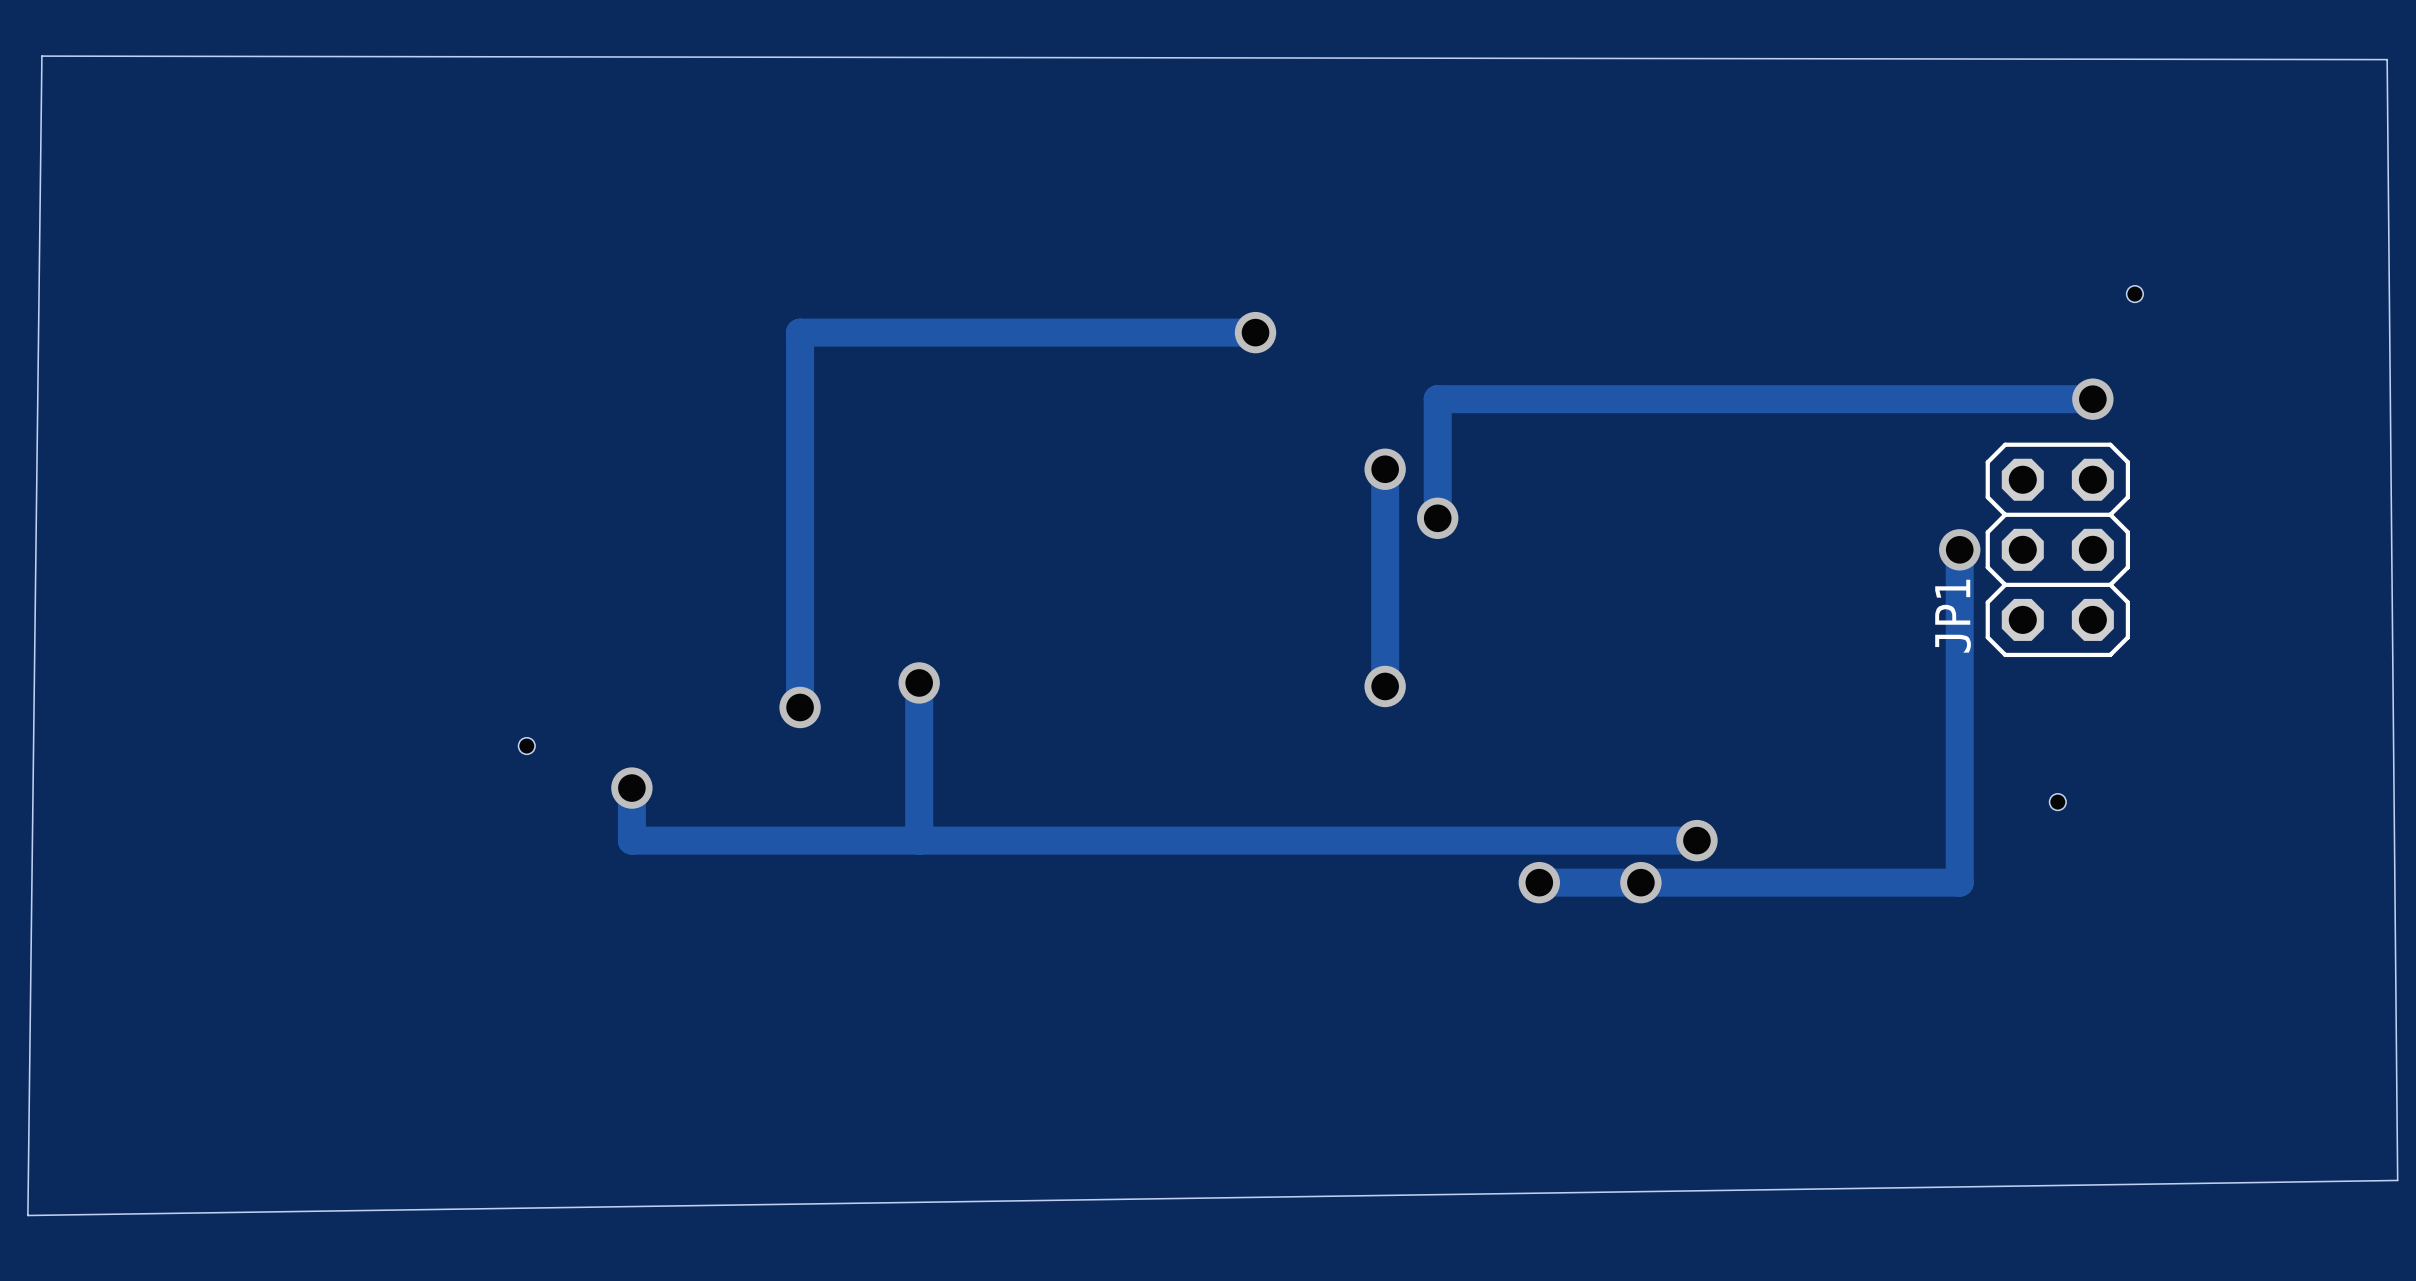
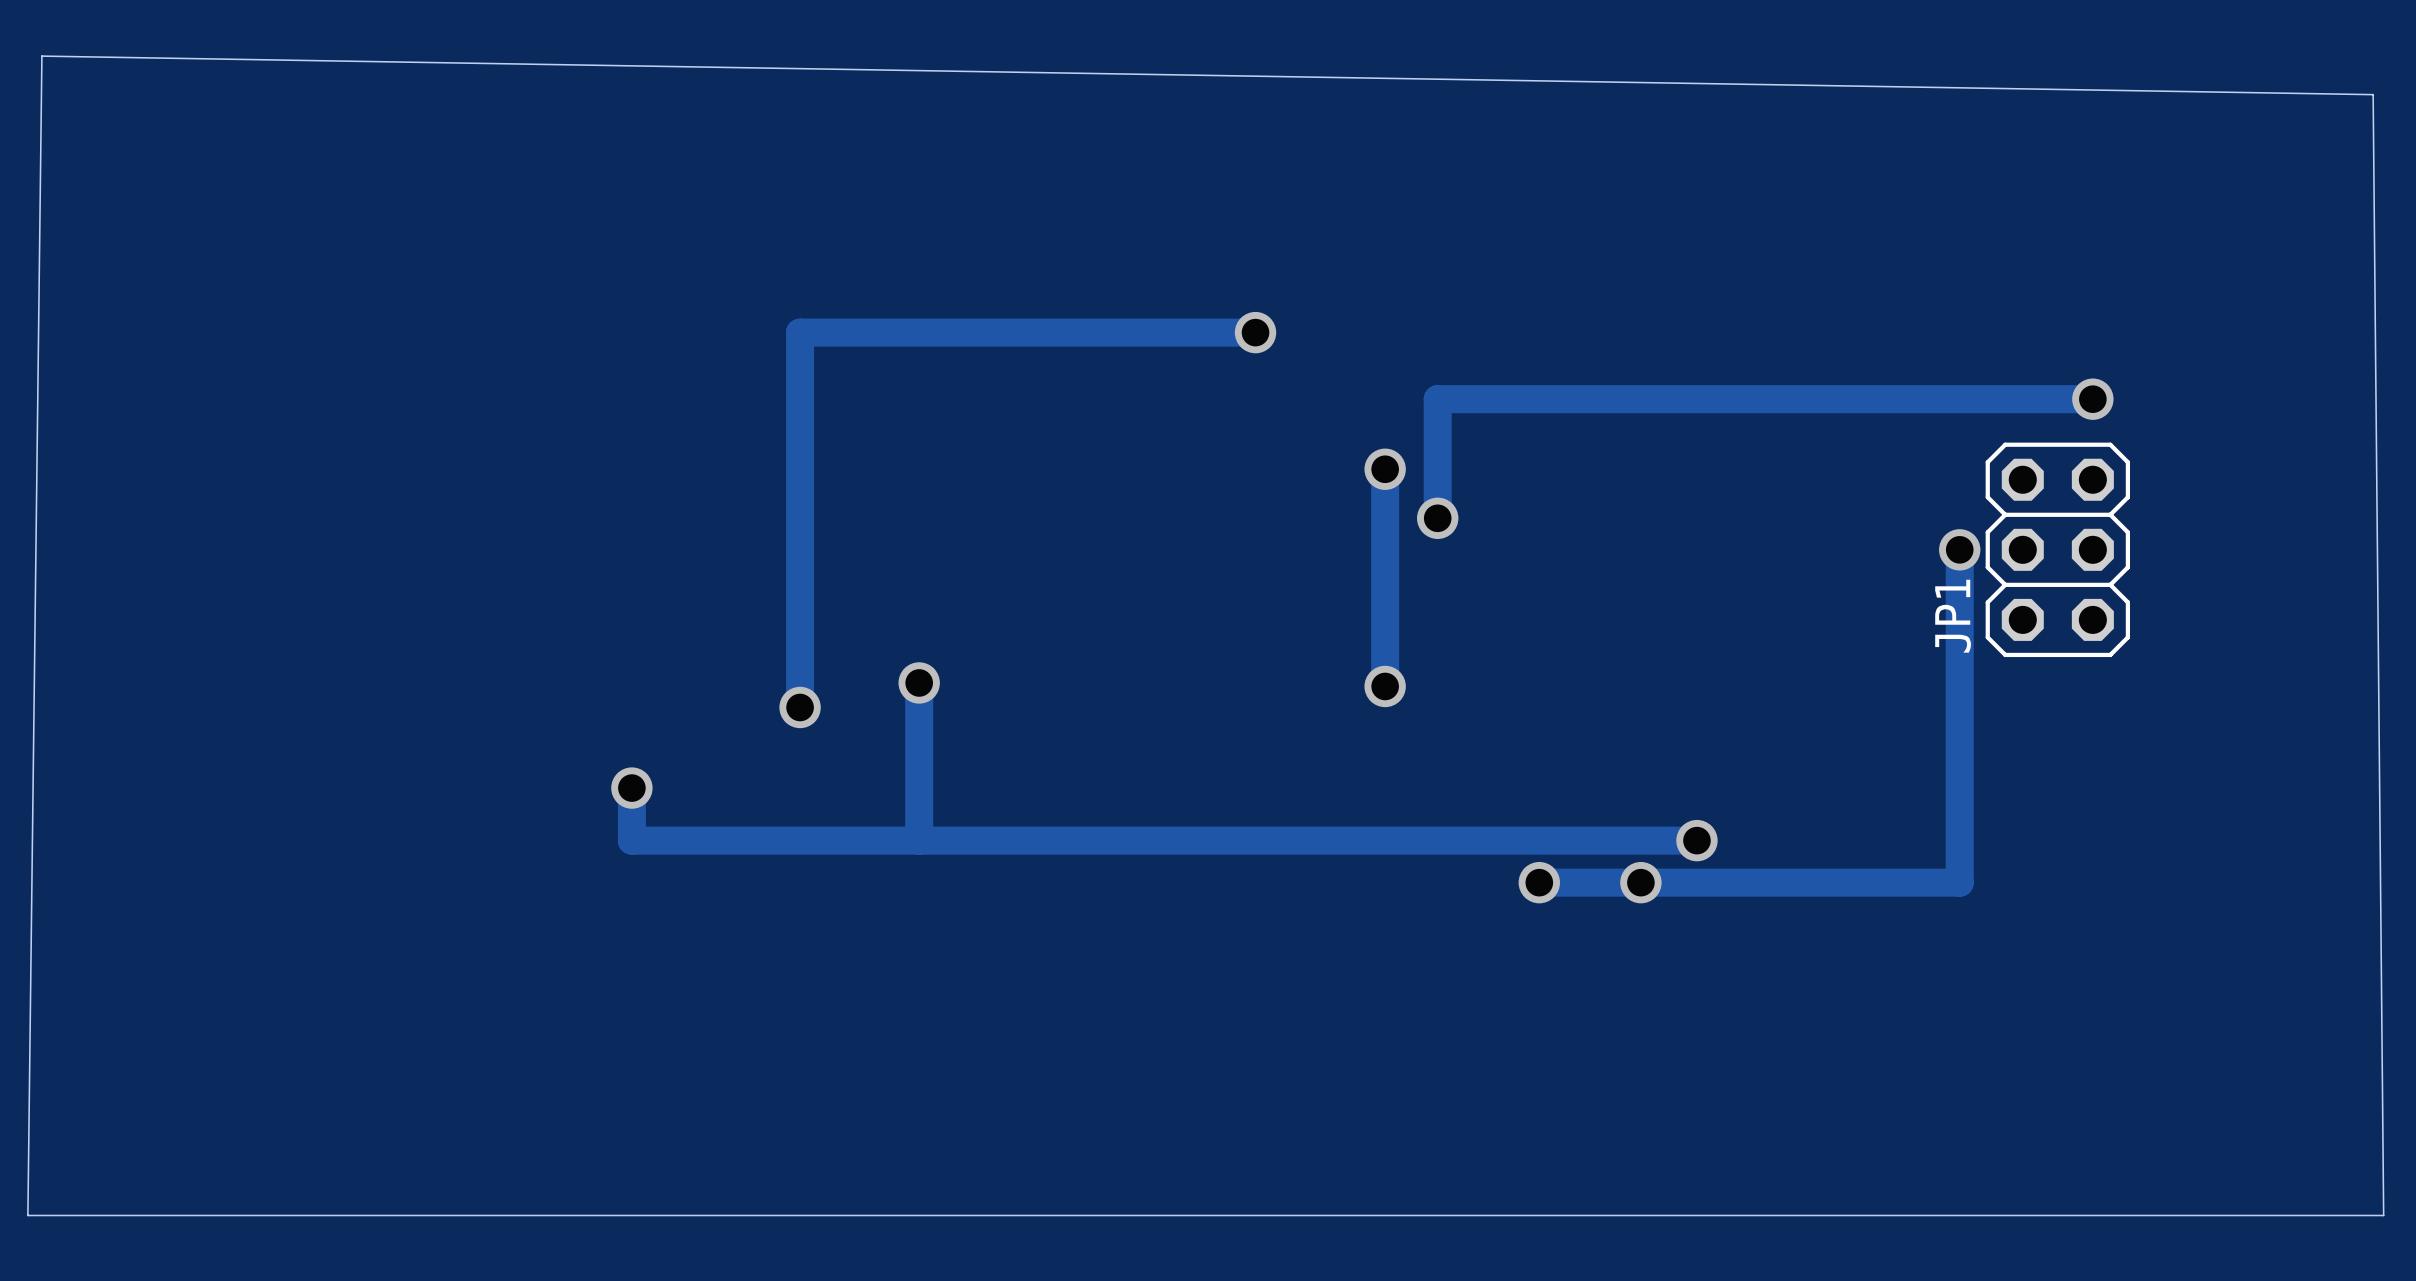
board edge: (41, 56) (2387, 59) (2397, 1180) (27, 1215) -> (41, 56) (2373, 94) (2383, 1215) (27, 1215)
hole: (2134, 294) -> none
hole: (526, 746) -> none
hole: (2057, 802) -> none

